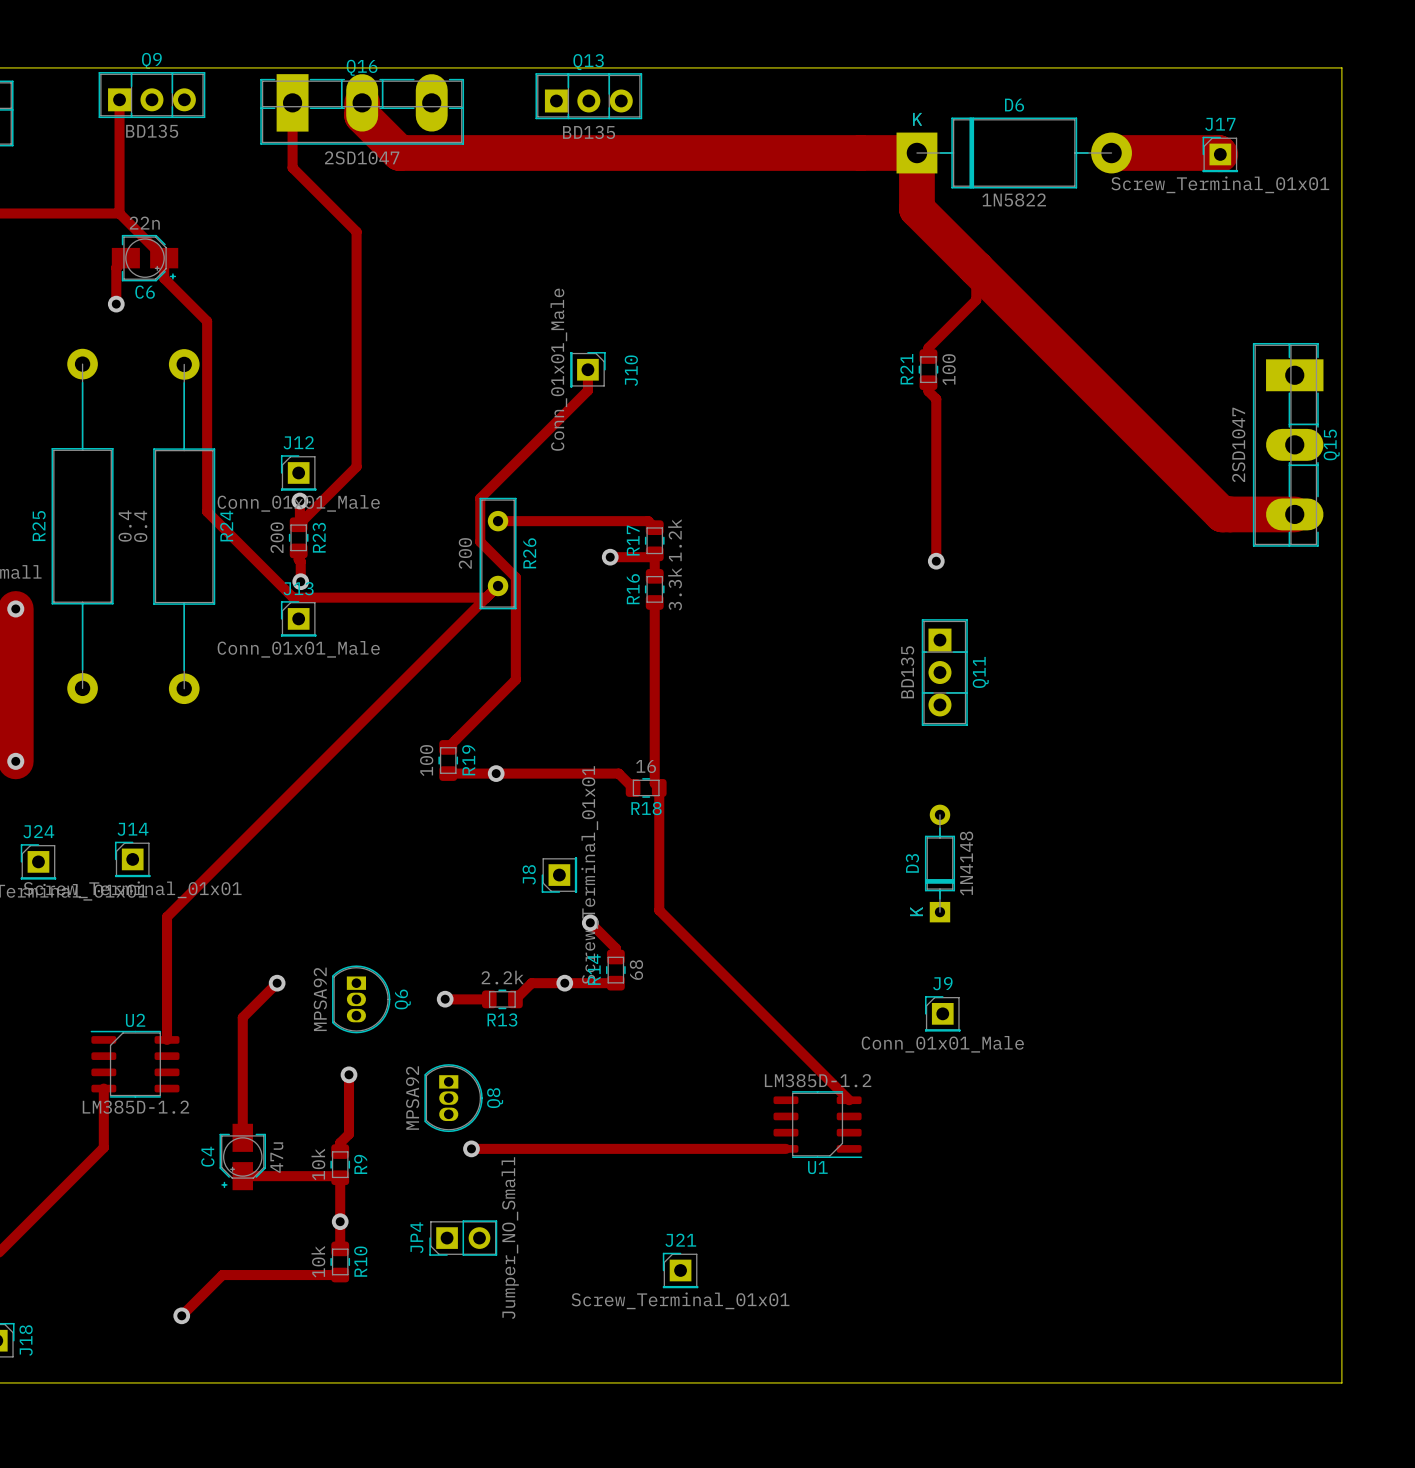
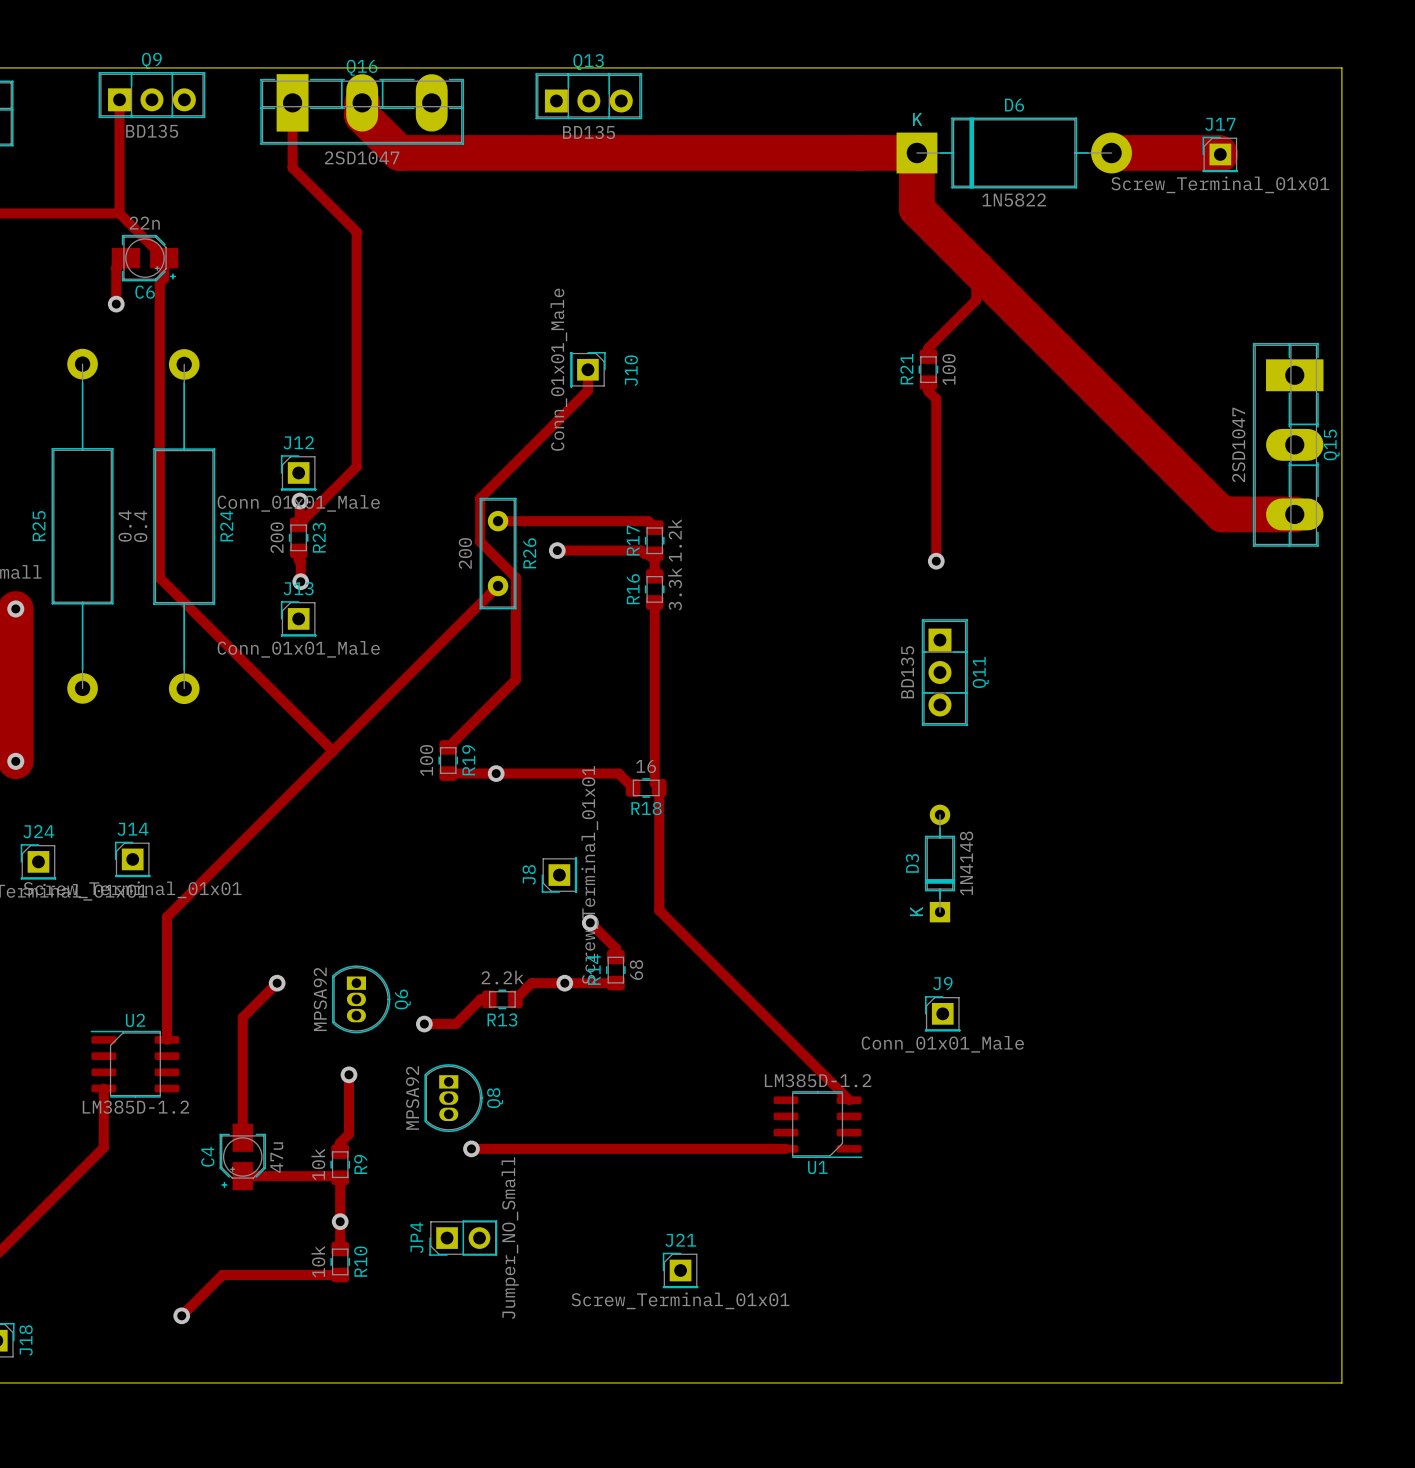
track: (164, 278) (207, 321) (207, 511) (293, 597) (486, 597) -> (164, 278) (159, 282) (159, 577) (332, 751)
track: none -> (557, 550) (641, 550) (644, 553) (654, 553)
track: (610, 557) (651, 557) -> none
via position: (610, 557) -> (557, 550)
track: (445, 999) (480, 999) -> (424, 1024) (456, 1024) (480, 999)
via position: (445, 999) -> (424, 1024)

